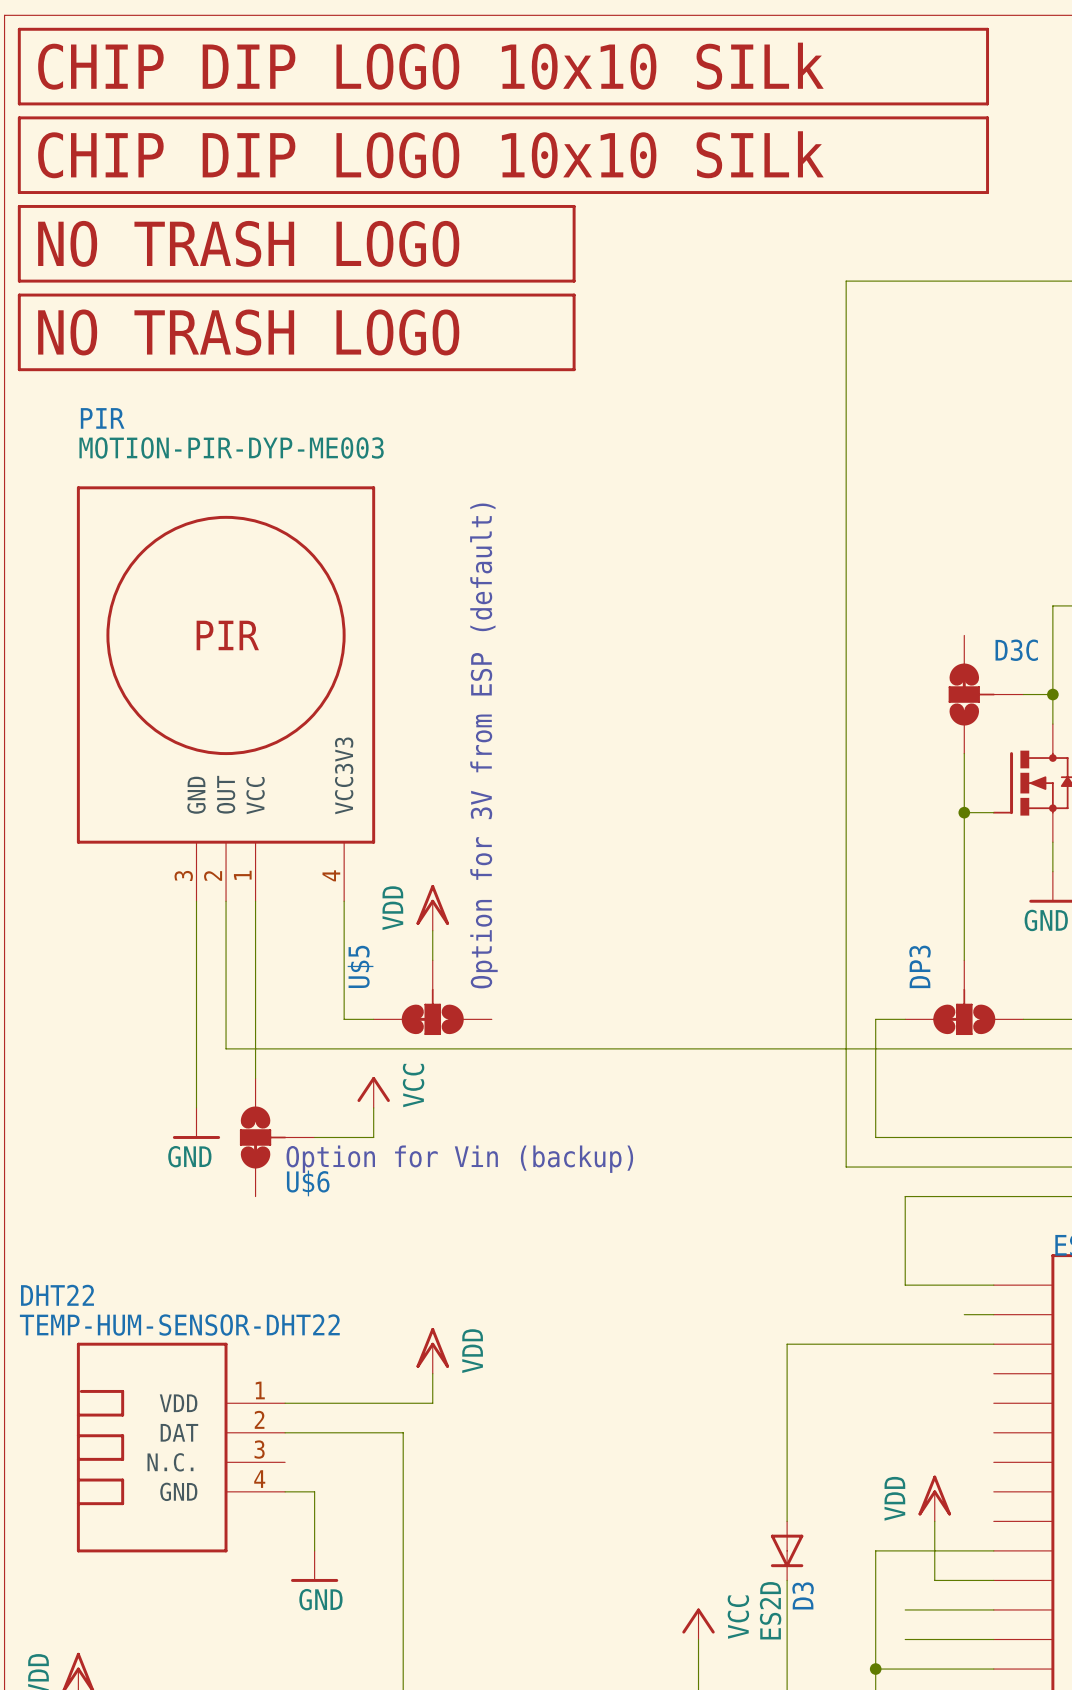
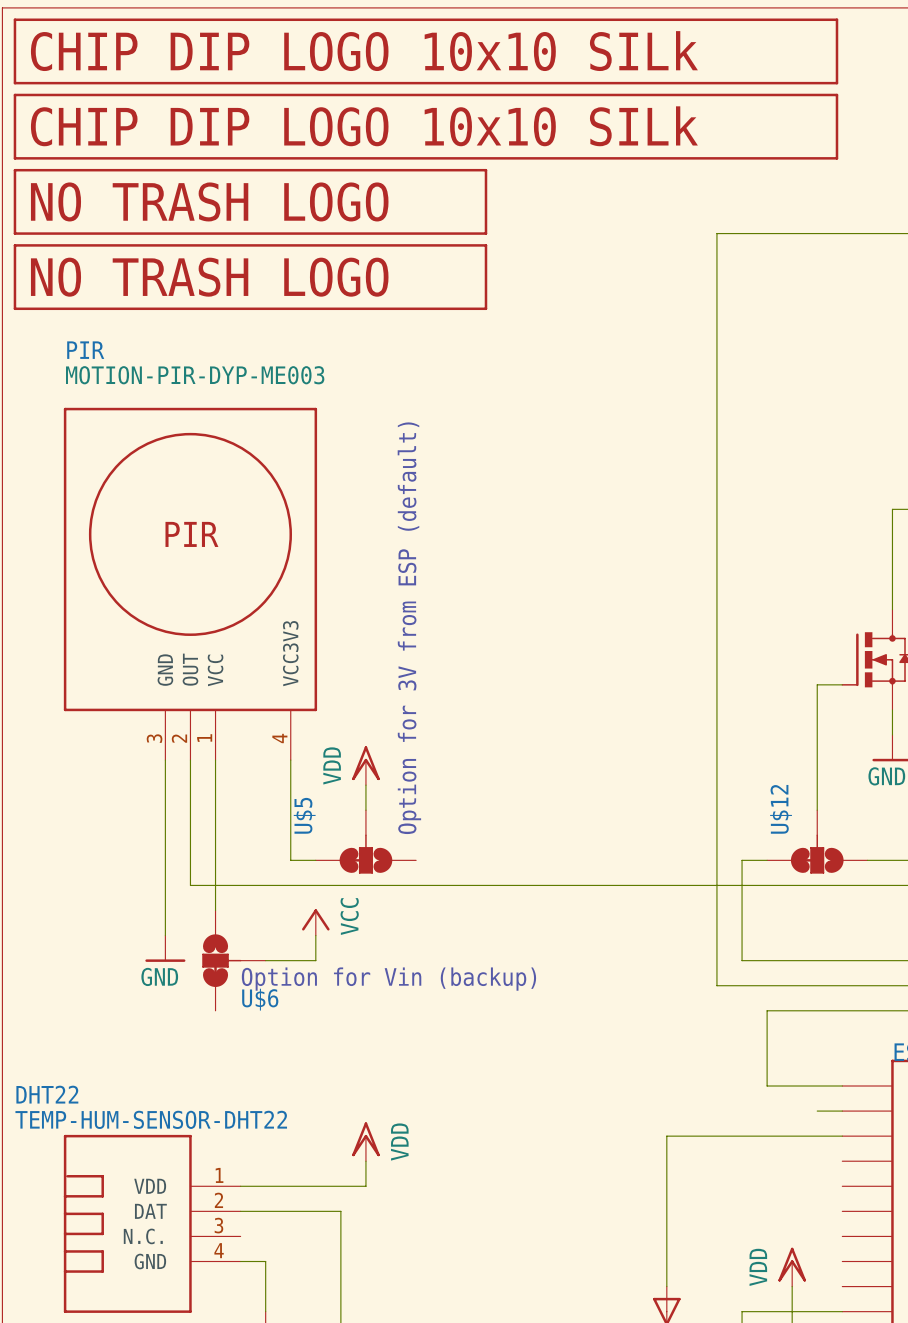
D3C: (985, 694) -> none
wire: (1023, 694) (1052, 694) -> none
junction: (1052, 694) -> none
wire: (964, 753) (964, 812) -> none
junction: (964, 812) -> none
DP3 name: DP3 (920, 966) -> U$12 (781, 809)

